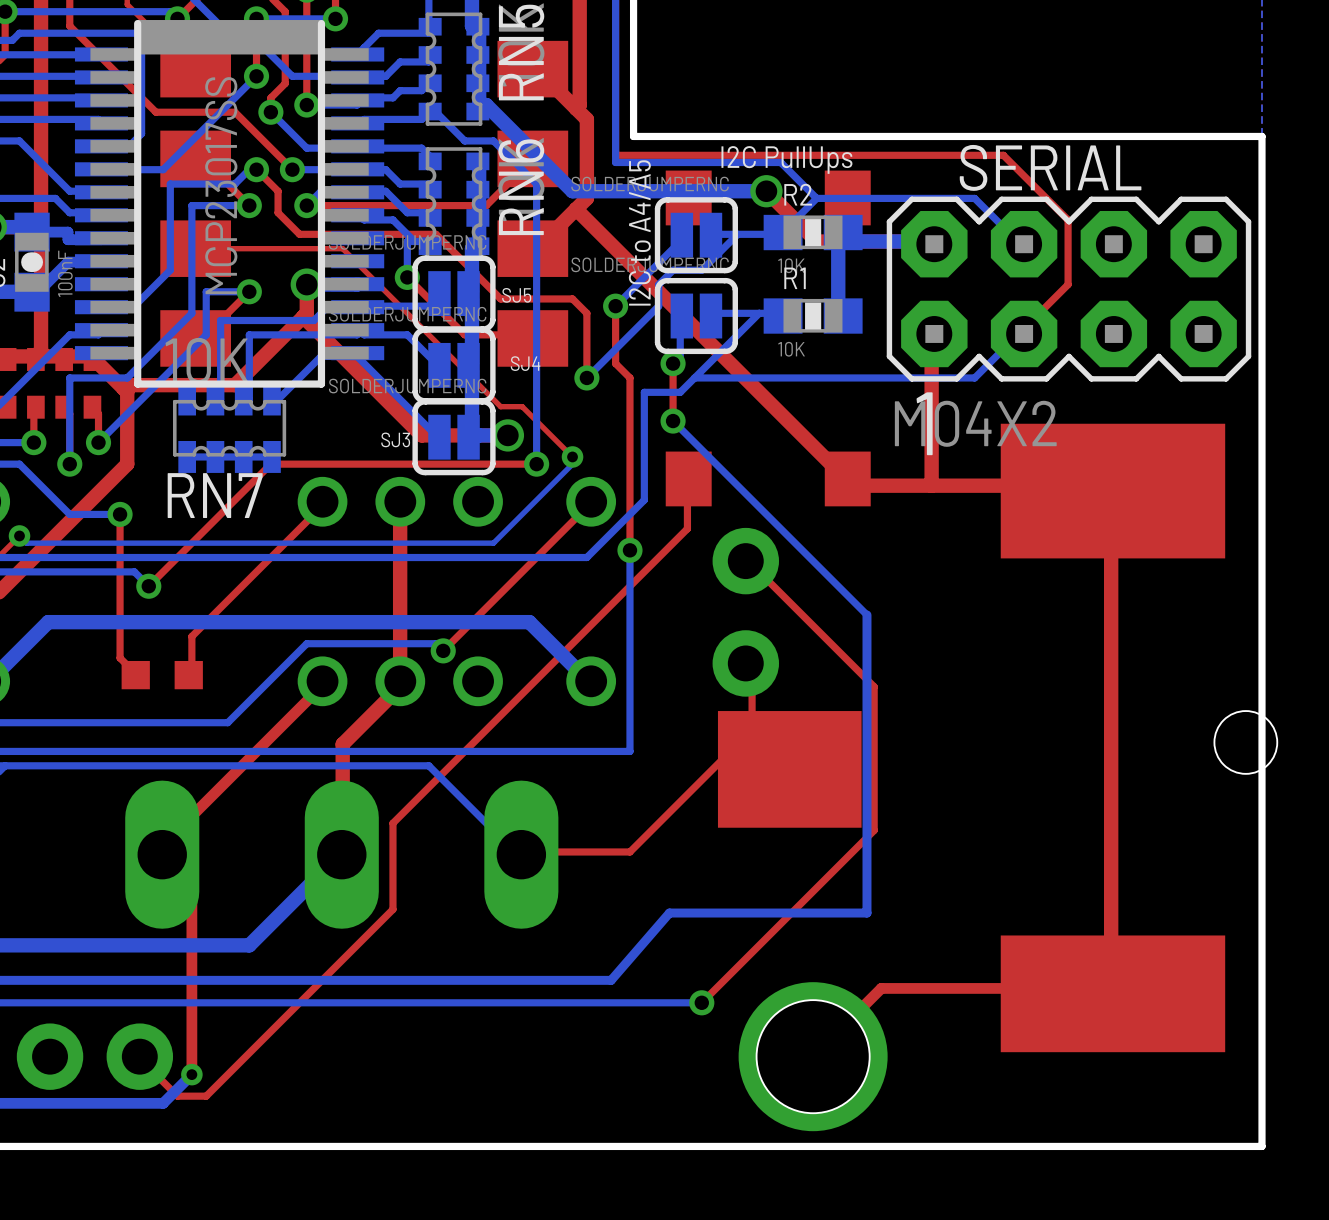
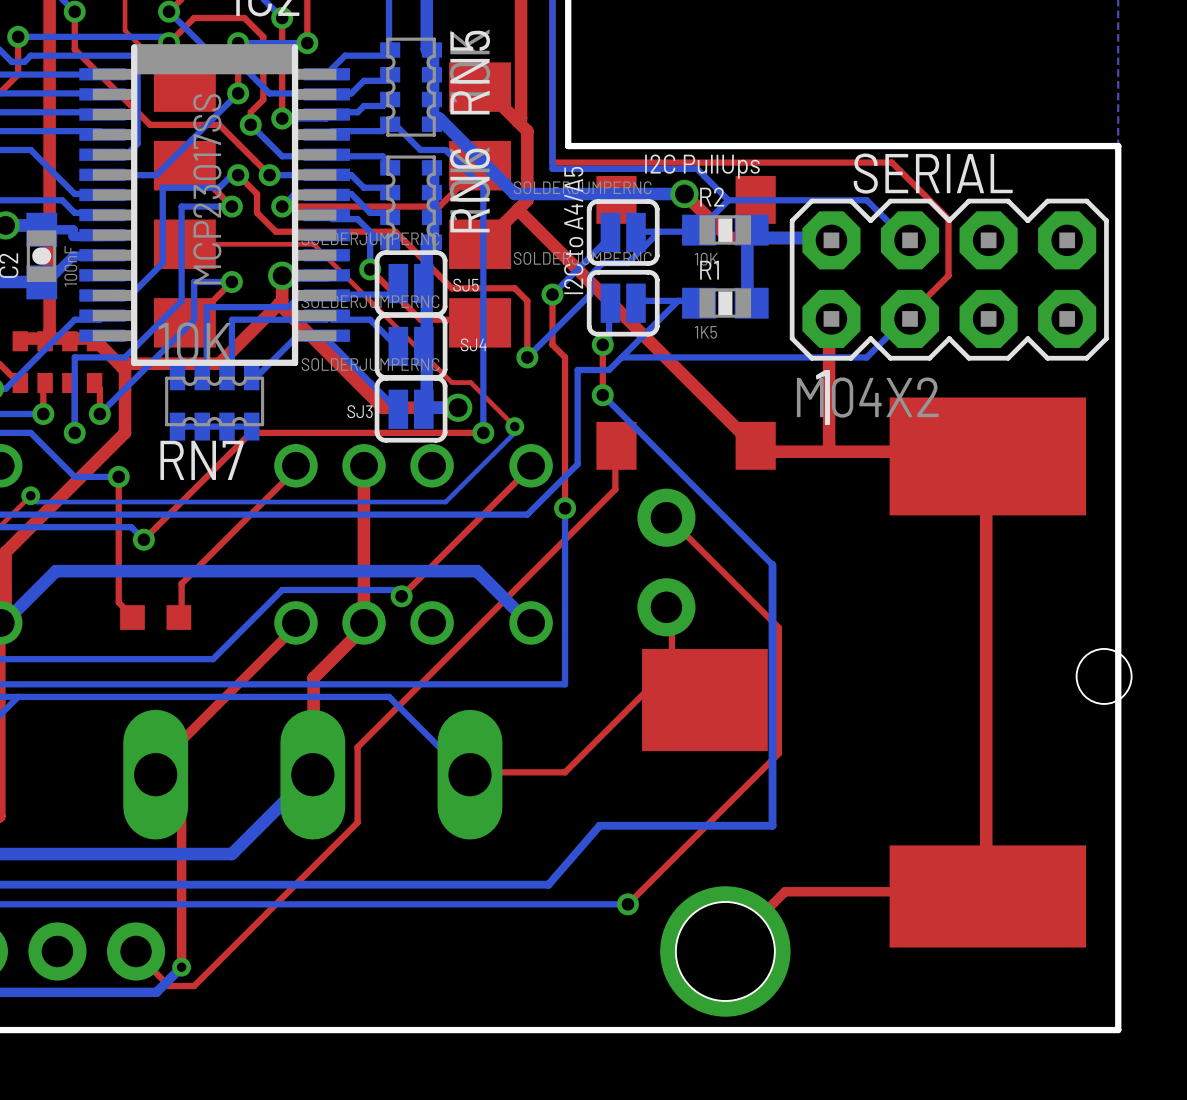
R1 value: 10K (791, 349) -> 1K5 (705, 332)

